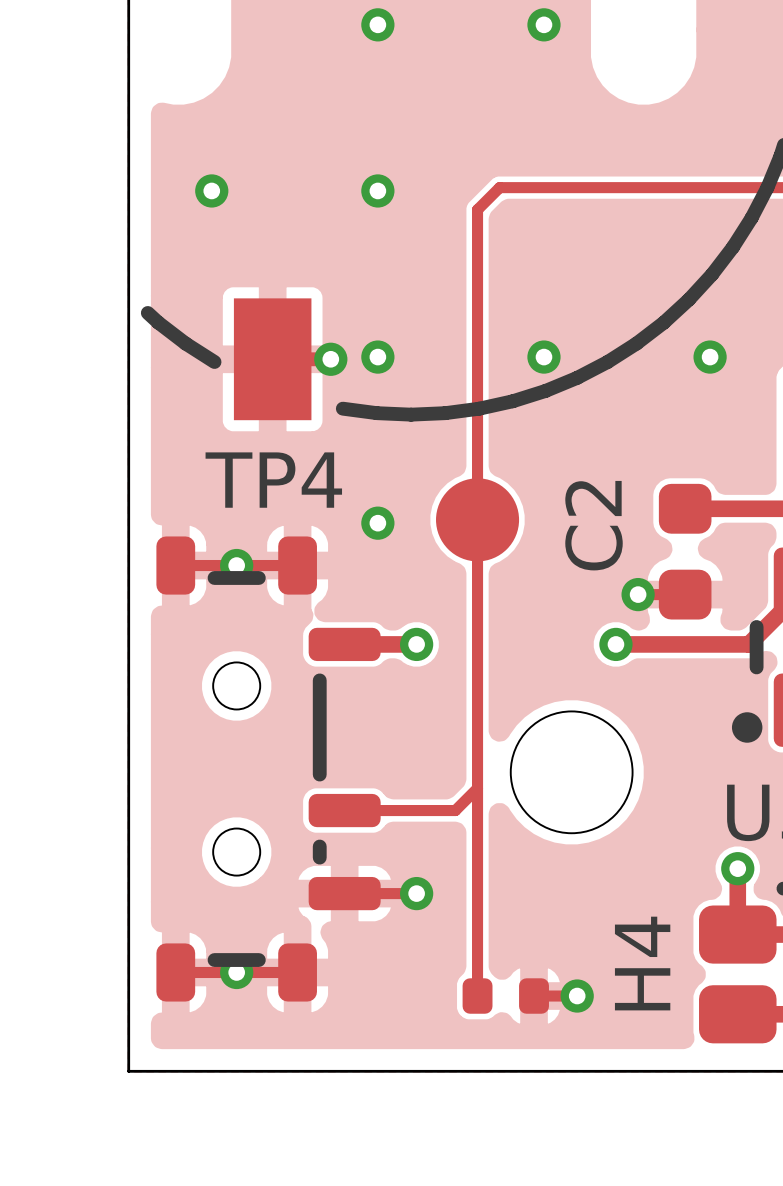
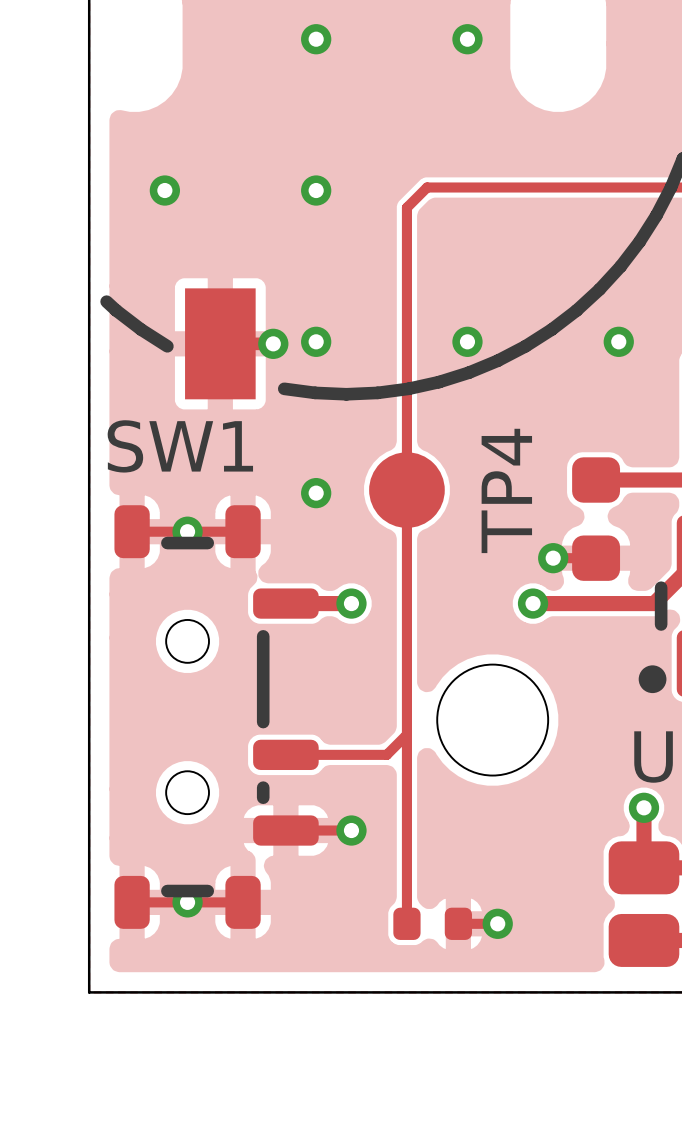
SW1 name: none -> SW1 (180, 446)
TP4 name rotation: 0° (273, 480) -> 90° counterclockwise (506, 490)
TP4 name position: TP4 (273, 480) -> TP4 (506, 490)
C2 name: C2 (594, 525) -> none
H4 name: H4 (642, 963) -> none

